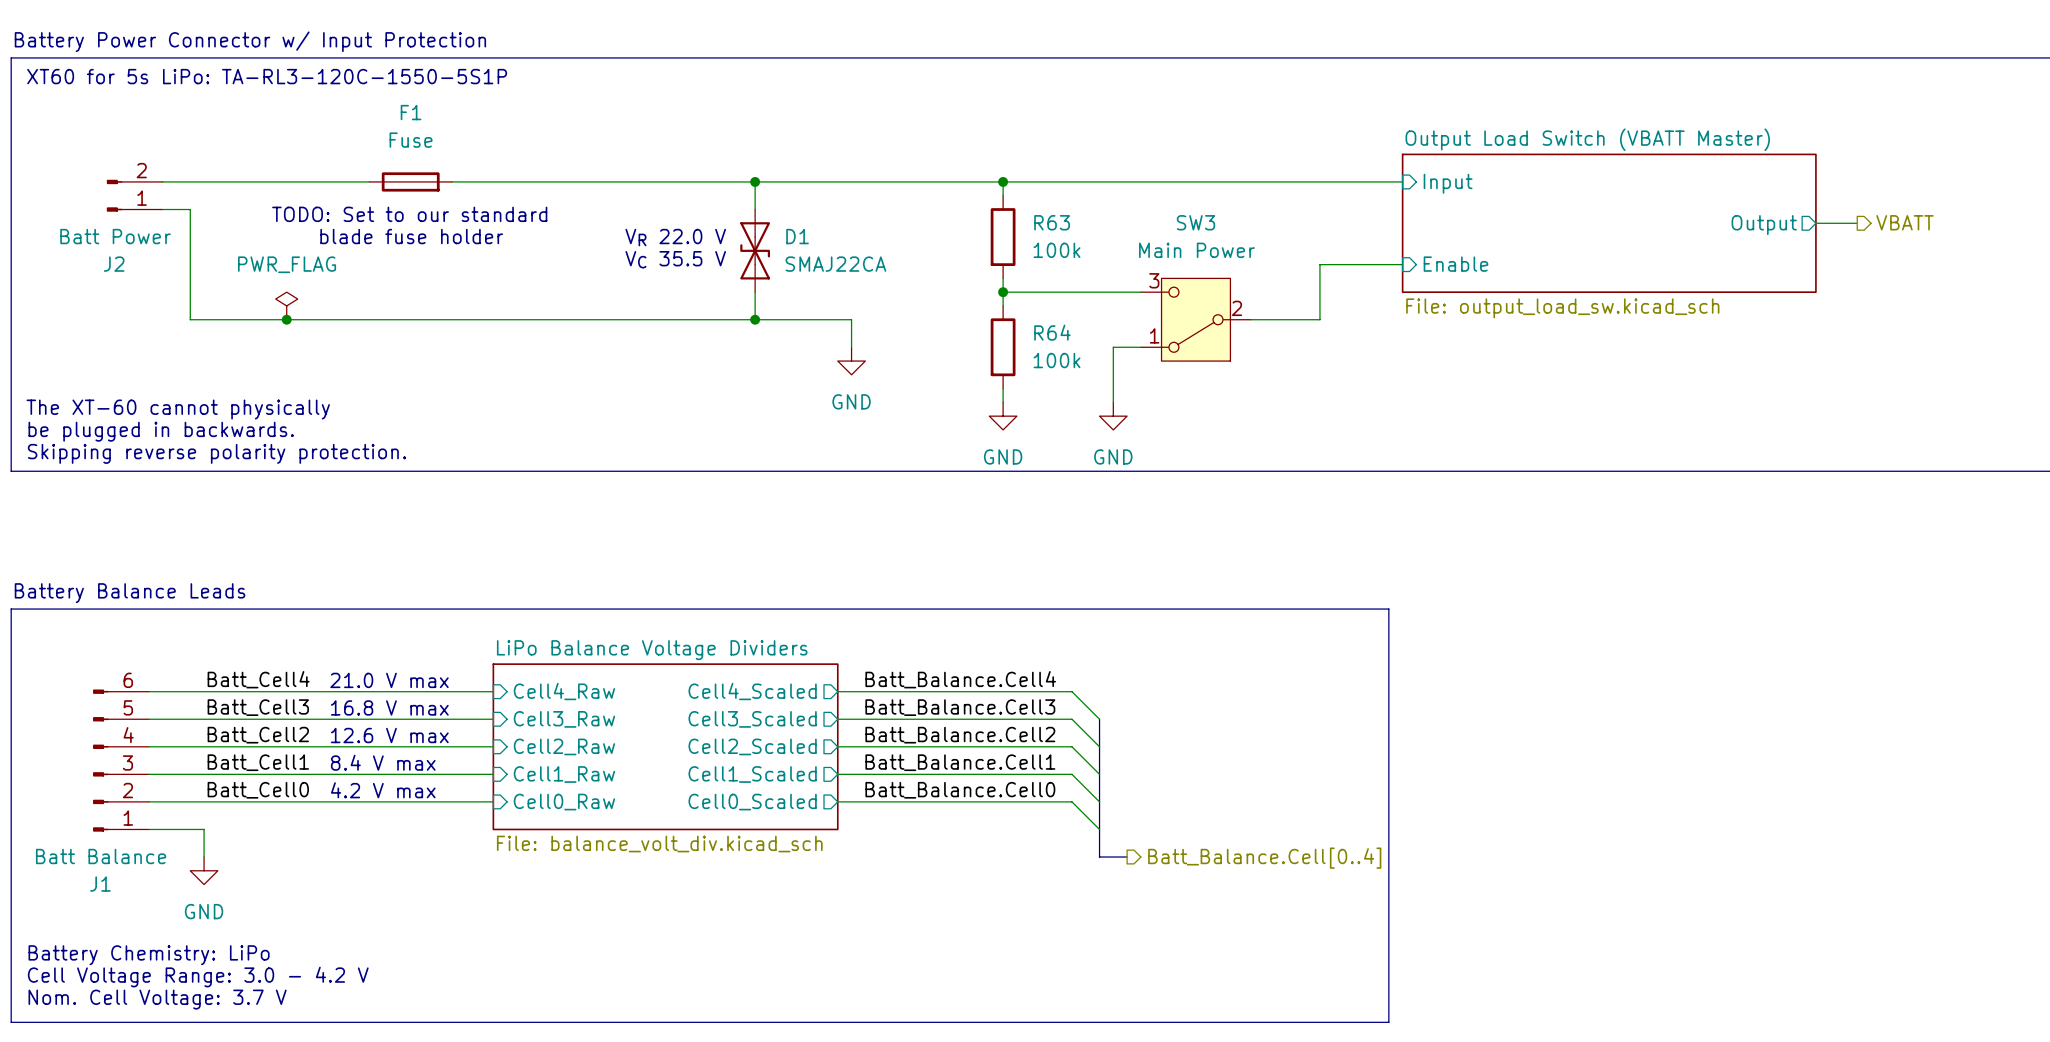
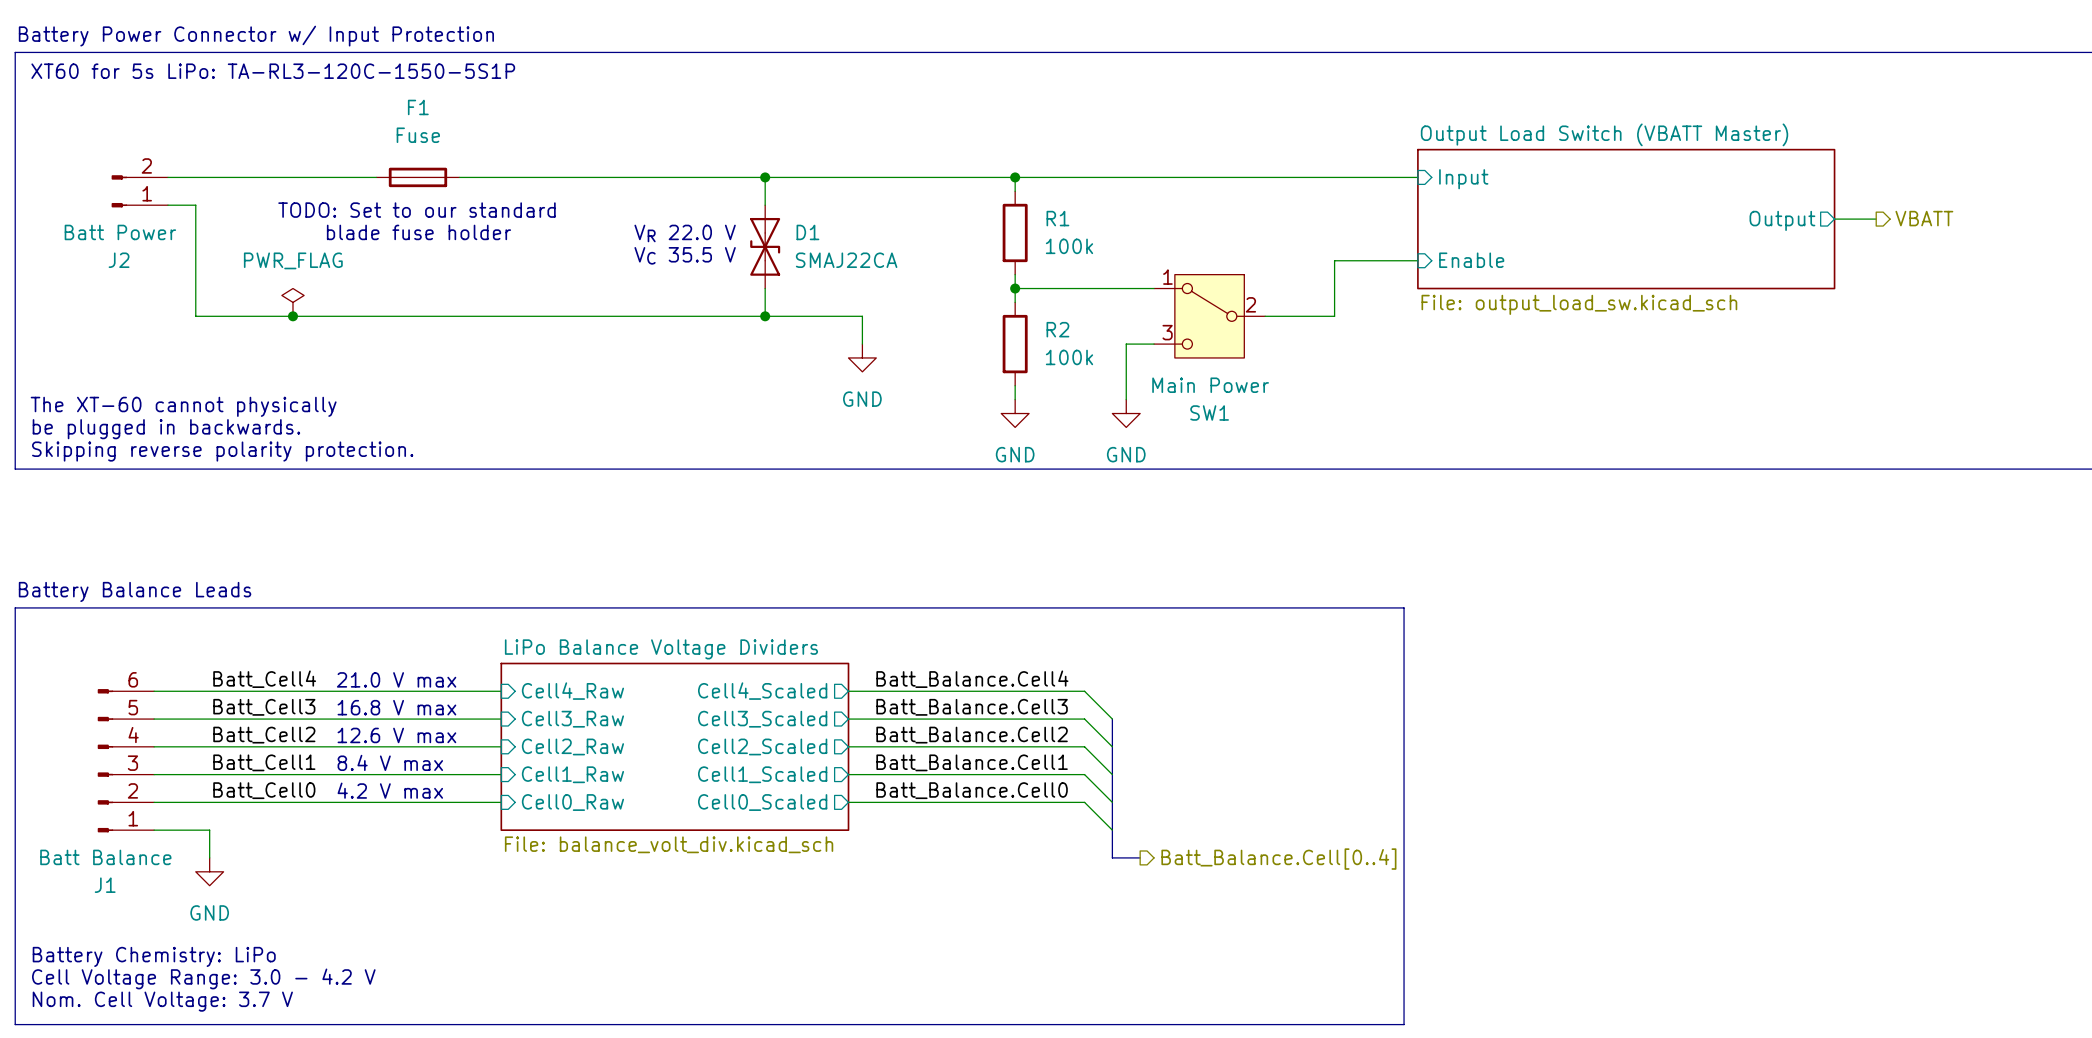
R63 name: R63 (1052, 222) -> R1 (1057, 218)
SW3: Main Power (1195, 319) -> none
SW1: none -> Main Power (1209, 316)
R64 name: R64 (1052, 332) -> R2 (1057, 329)

